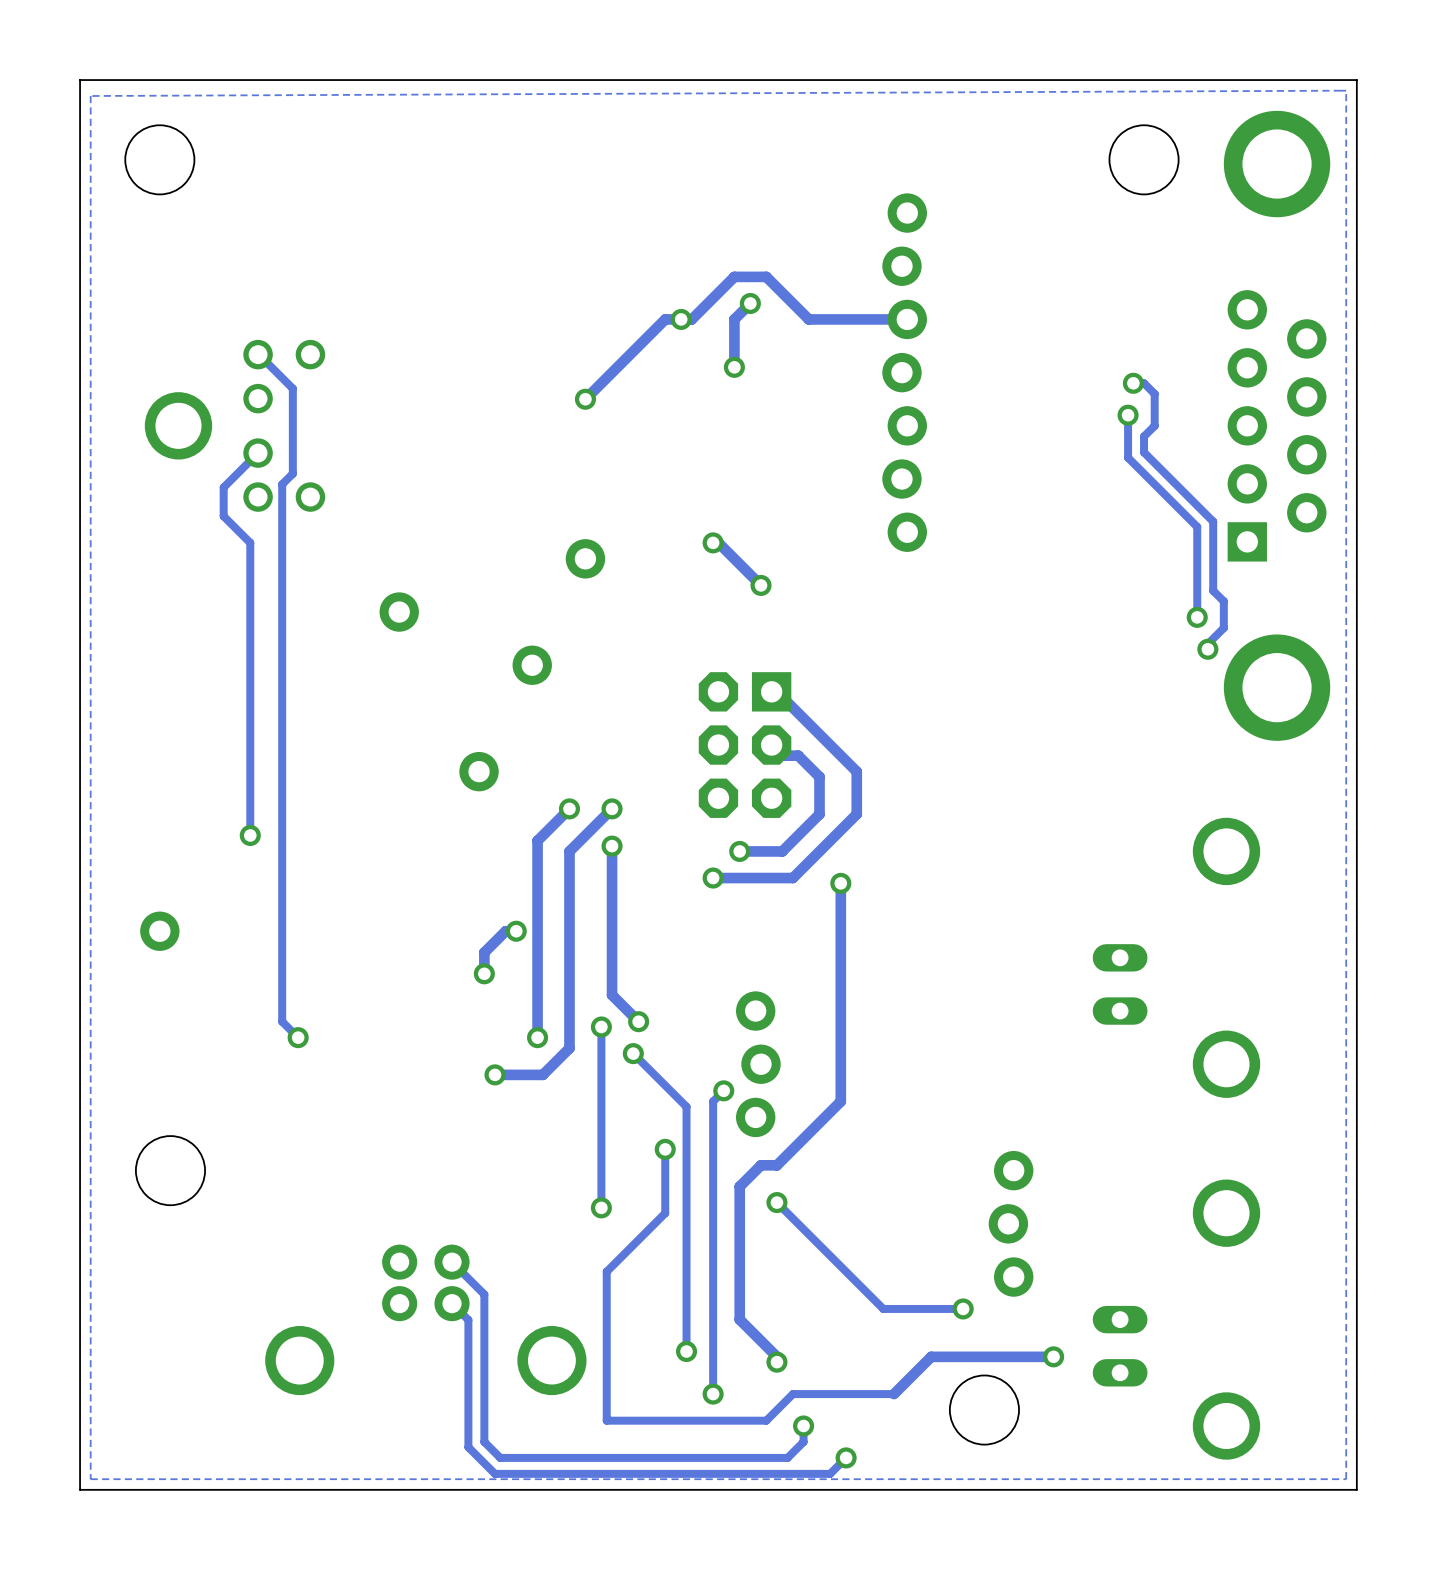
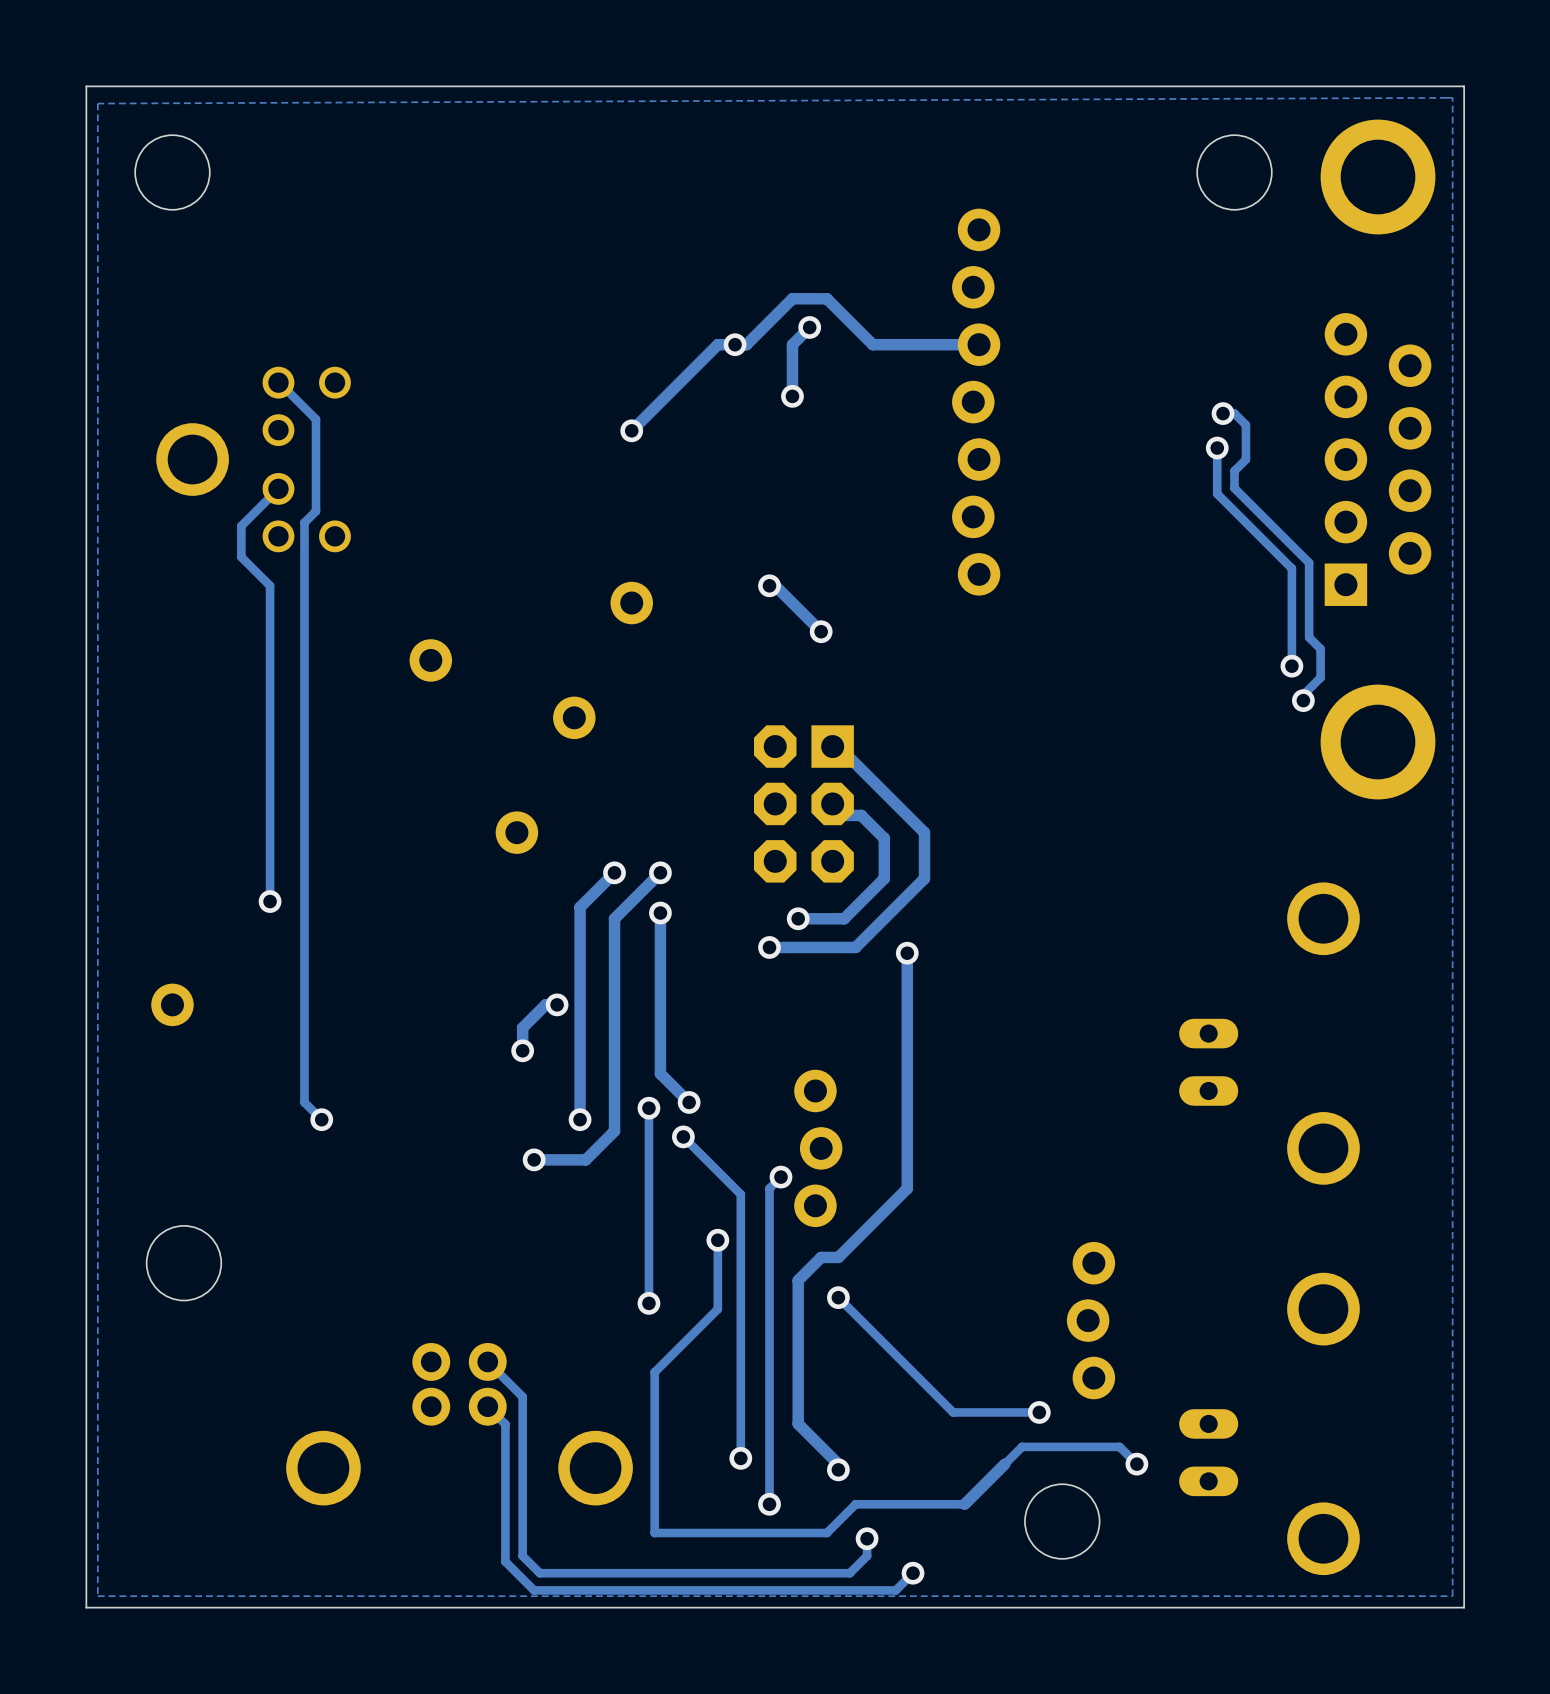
track: (1053, 1356) (931, 1356) -> (1136, 1464) (1119, 1446) (1022, 1446) (1004, 1464)

